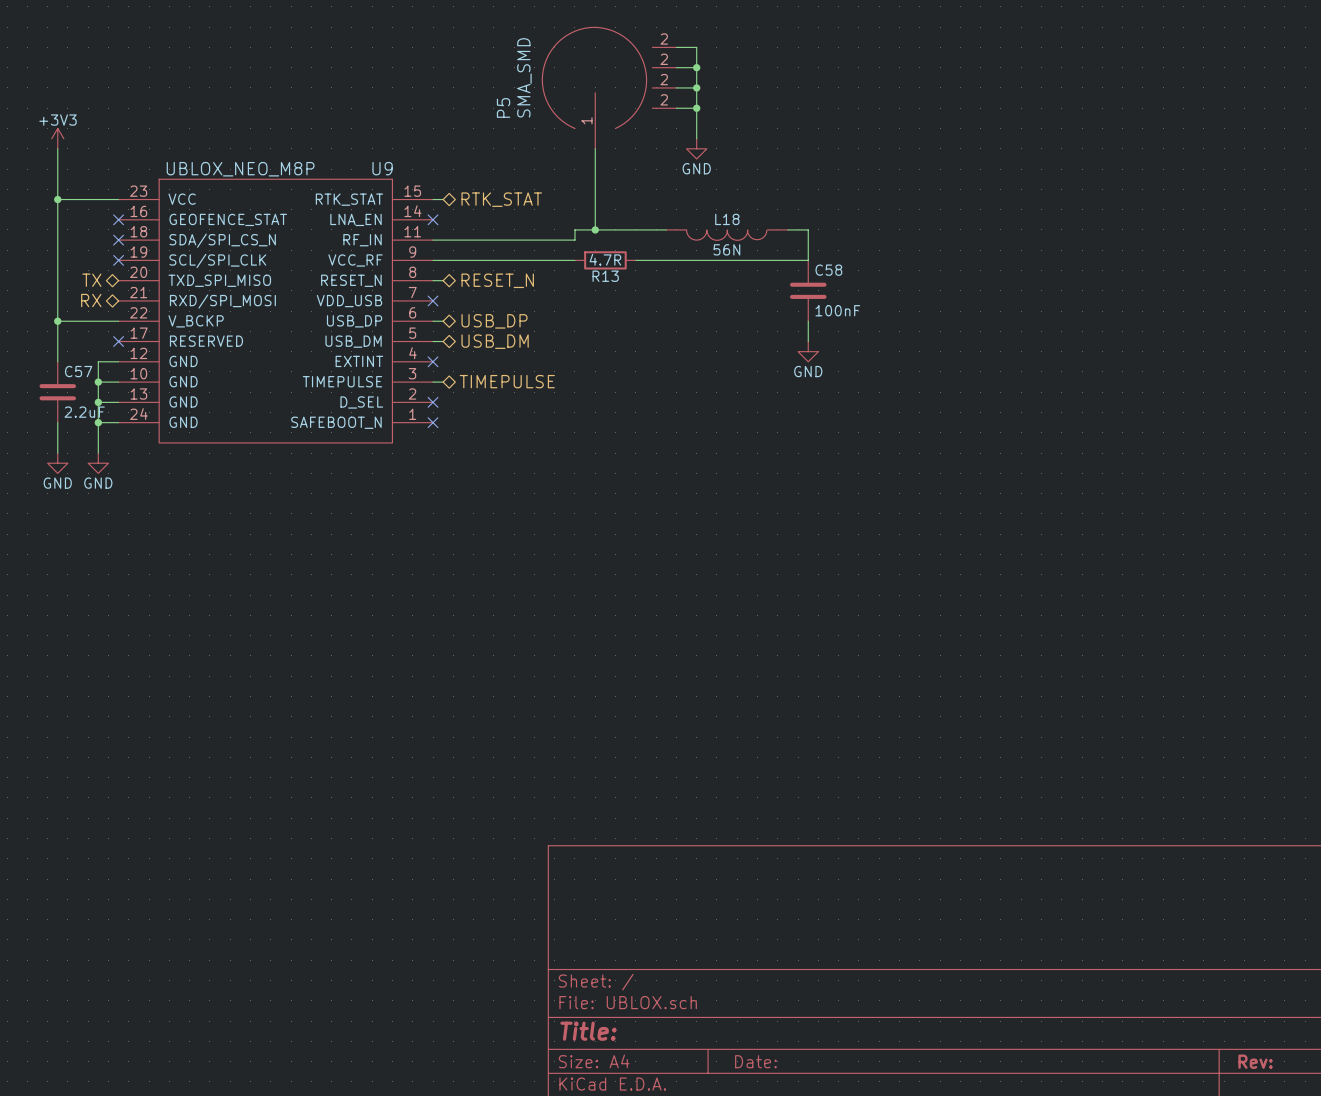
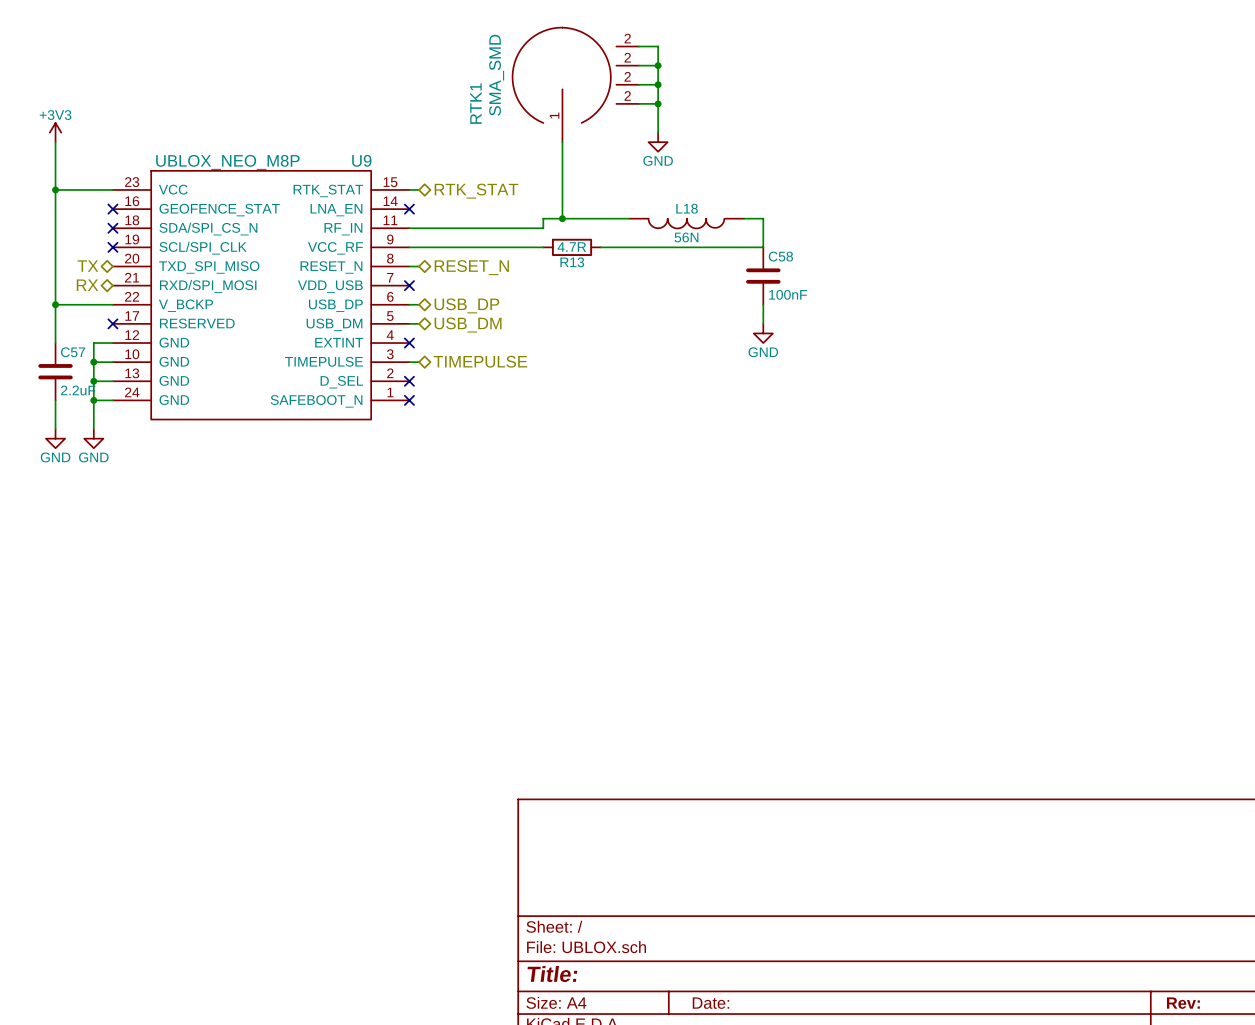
P5 name: P5 (503, 107) -> RTK1 (475, 103)

